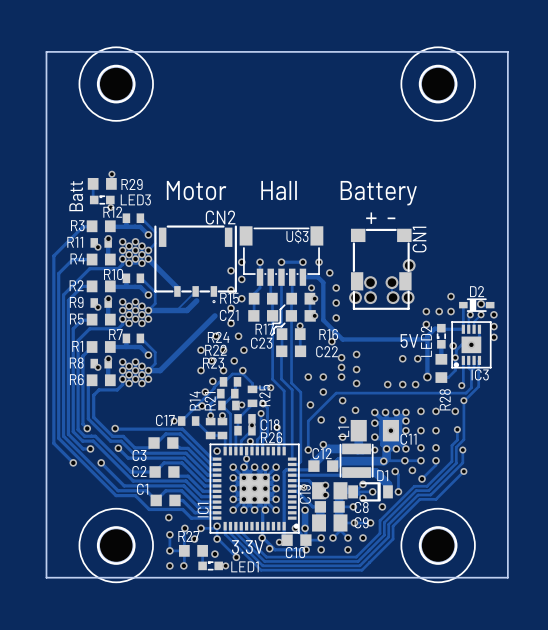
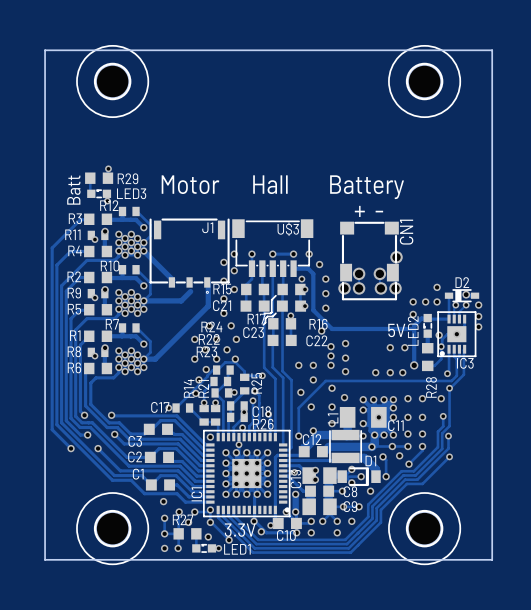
CN2 name: CN2 (220, 217) -> J1 (207, 227)
track: (195, 291) (177, 309) (149, 309) -> none
track: none -> (208, 282) (208, 306)

